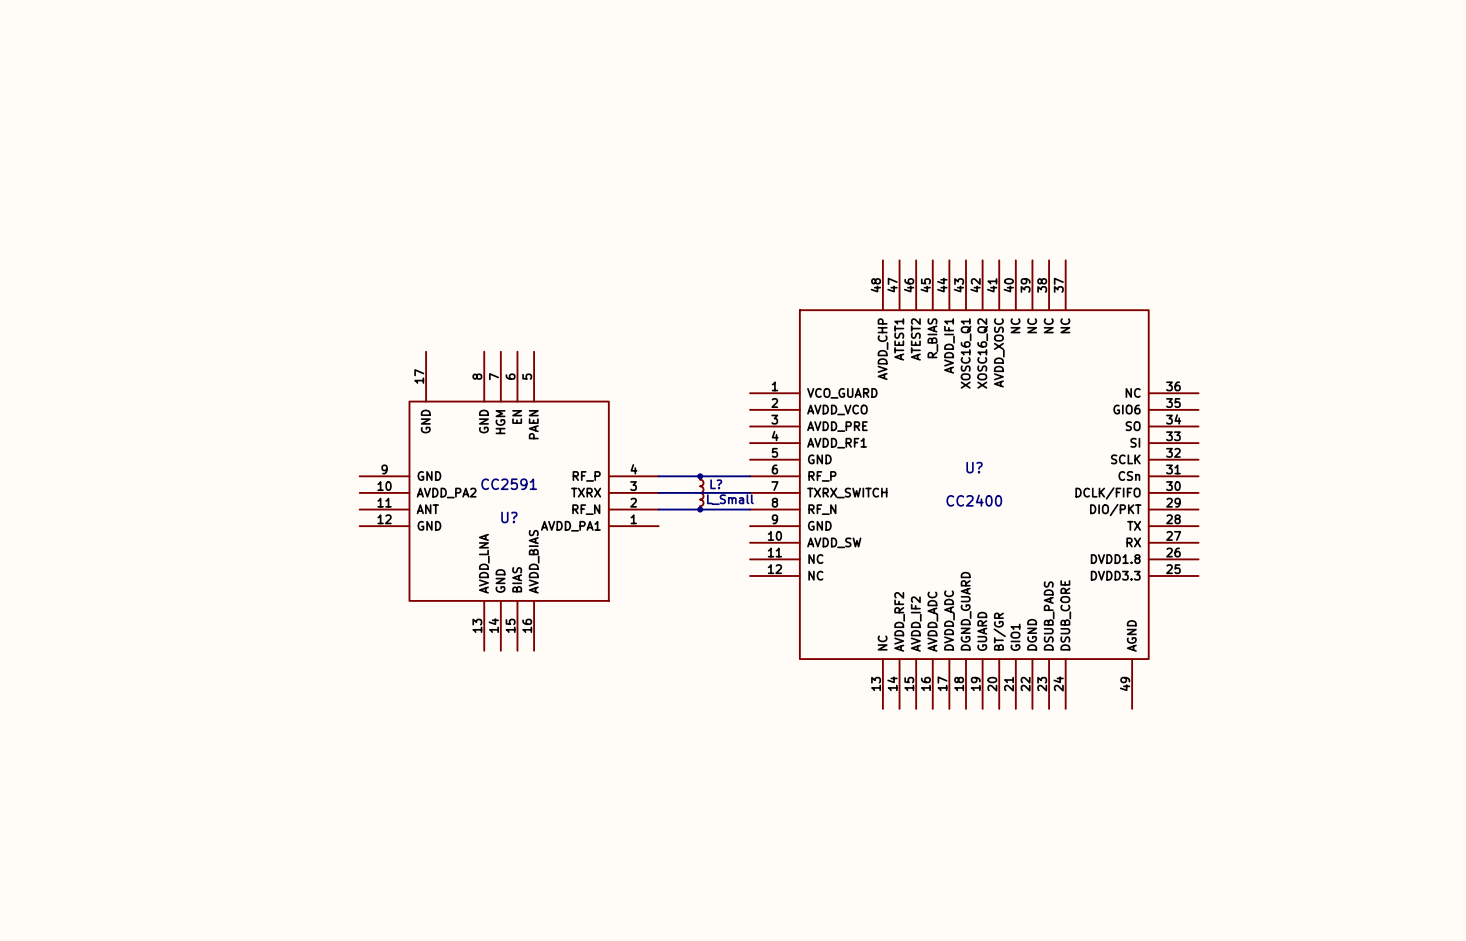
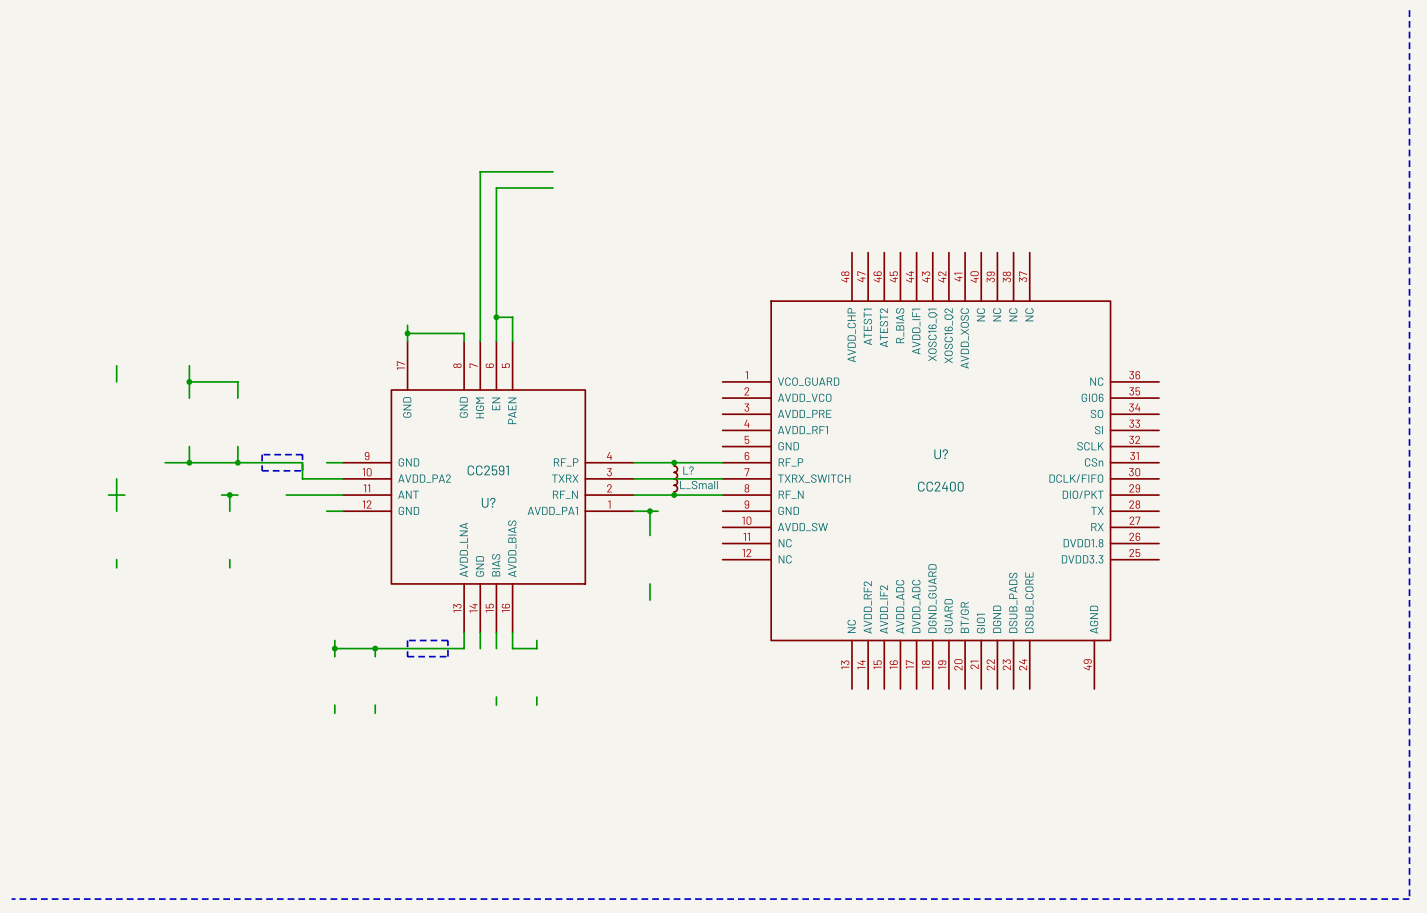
line: none -> (1409, 10) (1409, 899) (11, 899)
wire: none -> (553, 171) (480, 171) (480, 341)
wire: none -> (553, 188) (496, 188) (496, 341)
wire: none -> (496, 317) (512, 317) (512, 341)
junction: none -> (496, 317)
wire: none -> (407, 325) (407, 341)
wire: none -> (407, 333) (464, 333) (464, 341)
junction: none -> (407, 333)
wire: none -> (116, 365) (116, 381)
wire: none -> (189, 365) (189, 398)
wire: none -> (189, 381) (237, 381) (237, 398)
junction: none -> (189, 381)
wire: none -> (189, 446) (189, 462)
wire: none -> (237, 446) (237, 462)
line: none -> (262, 454) (262, 470) (302, 470) (302, 454) (262, 454)
wire: none -> (165, 462) (302, 462) (302, 478) (342, 478)
junction: none -> (189, 462)
junction: none -> (237, 462)
wire: none -> (326, 462) (342, 462)
wire: none -> (116, 478) (116, 511)
wire: none -> (108, 495) (124, 495)
wire: none -> (221, 495) (237, 495)
wire: none -> (229, 495) (229, 511)
junction: none -> (229, 495)
wire: none -> (286, 495) (342, 495)
wire: none -> (326, 511) (342, 511)
wire: none -> (633, 511) (658, 511)
wire: none -> (649, 511) (649, 535)
junction: none -> (649, 511)
wire: none -> (116, 559) (116, 567)
wire: none -> (229, 559) (229, 567)
wire: none -> (649, 583) (649, 600)
wire: none -> (464, 632) (464, 648) (334, 648)
wire: none -> (480, 632) (480, 648)
wire: none -> (496, 632) (496, 648)
wire: none -> (512, 632) (512, 648) (536, 648) (536, 640)
wire: none -> (334, 640) (334, 656)
line: none -> (407, 640) (407, 656) (447, 656) (447, 640) (407, 640)
junction: none -> (334, 648)
wire: none -> (375, 648) (375, 656)
junction: none -> (375, 648)
wire: none -> (496, 697) (496, 705)
wire: none -> (536, 697) (536, 705)
wire: none -> (334, 705) (334, 713)
wire: none -> (375, 705) (375, 713)

